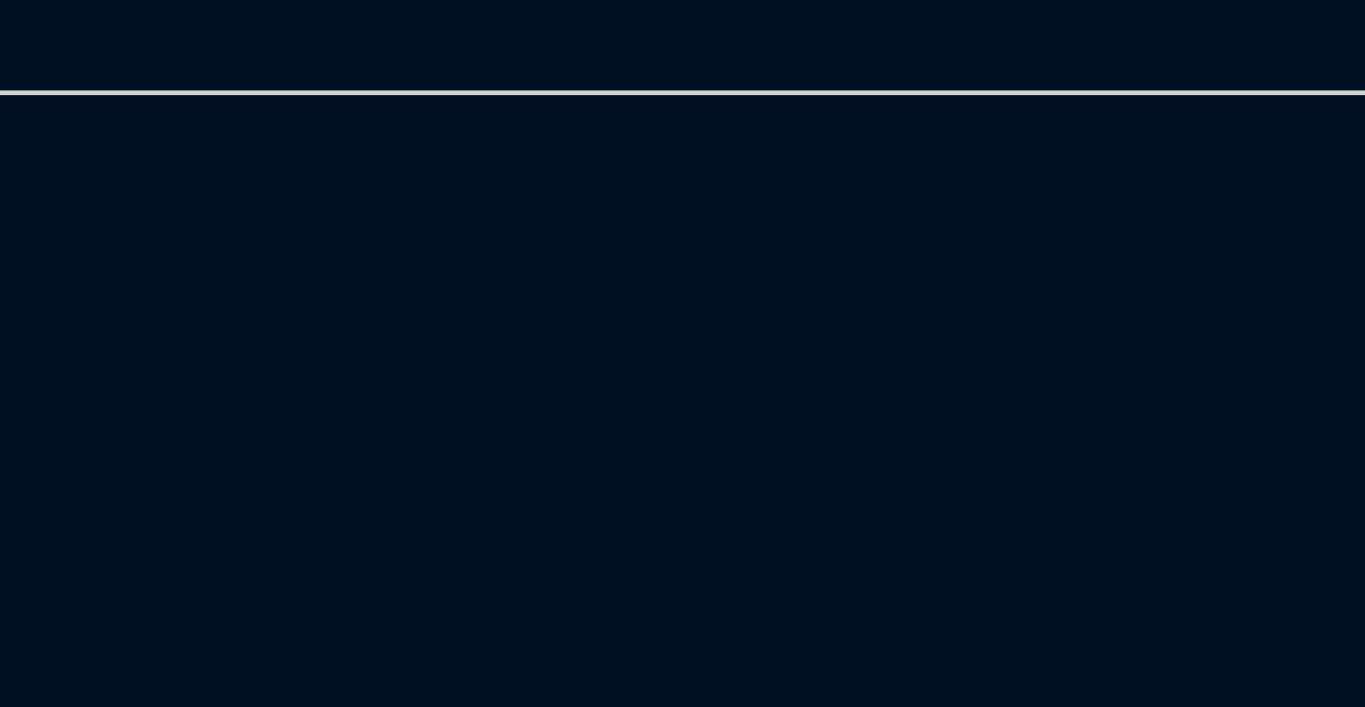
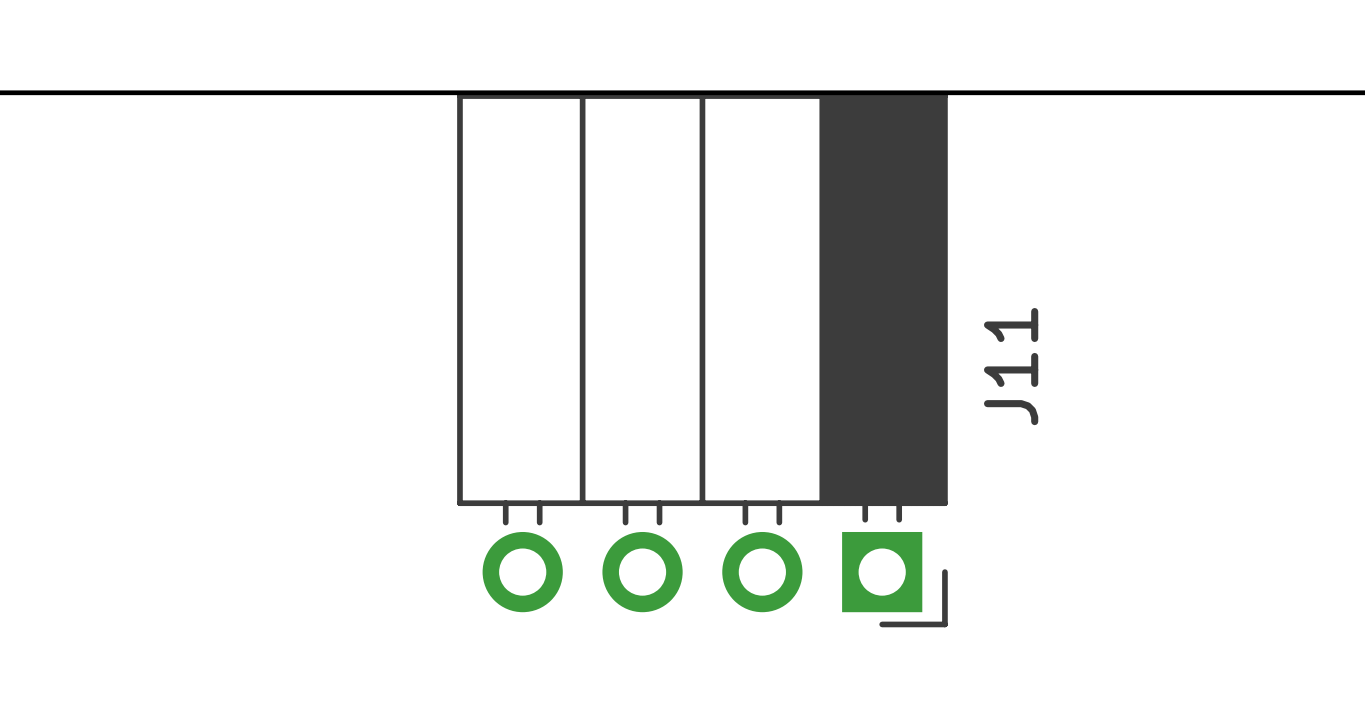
J11: none -> (702, 360)

